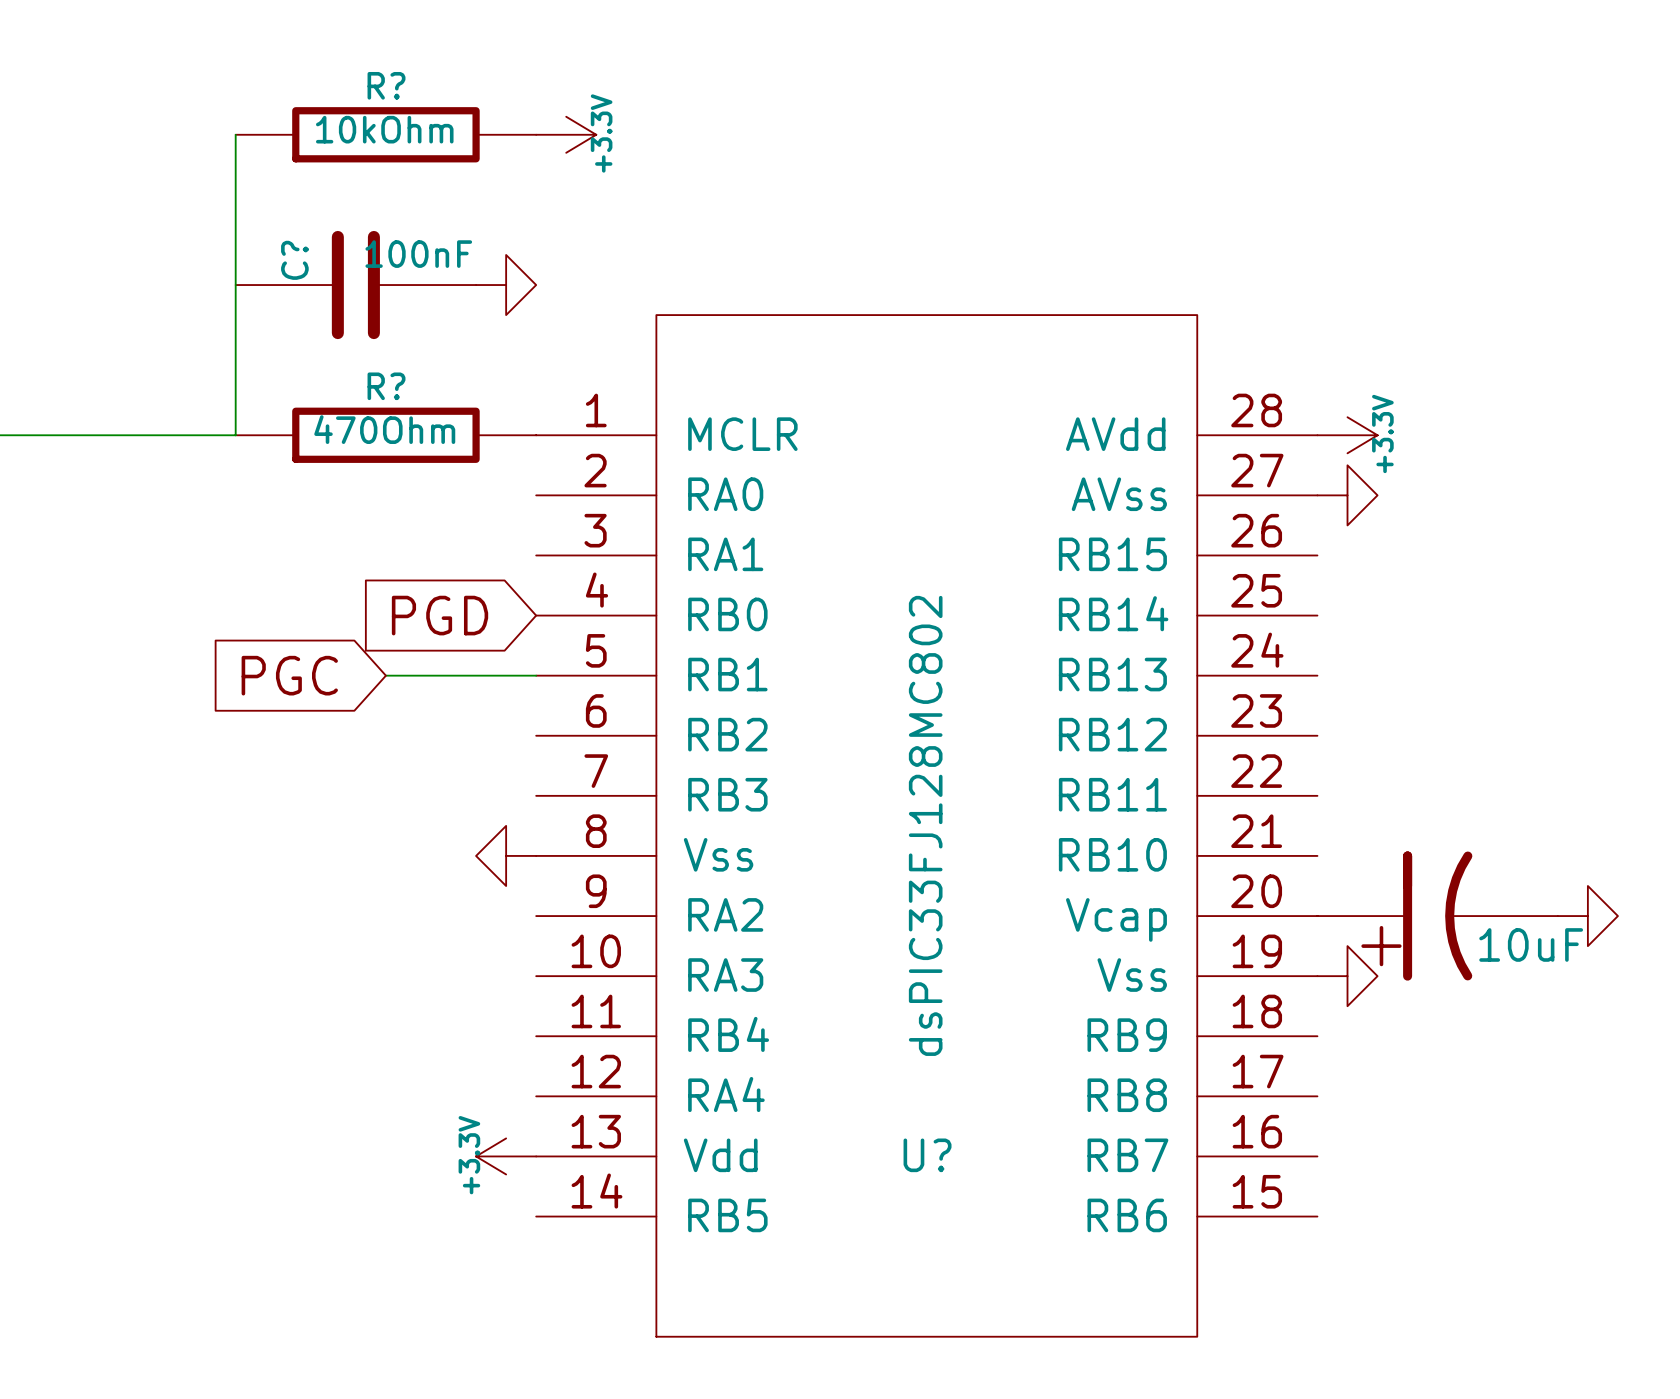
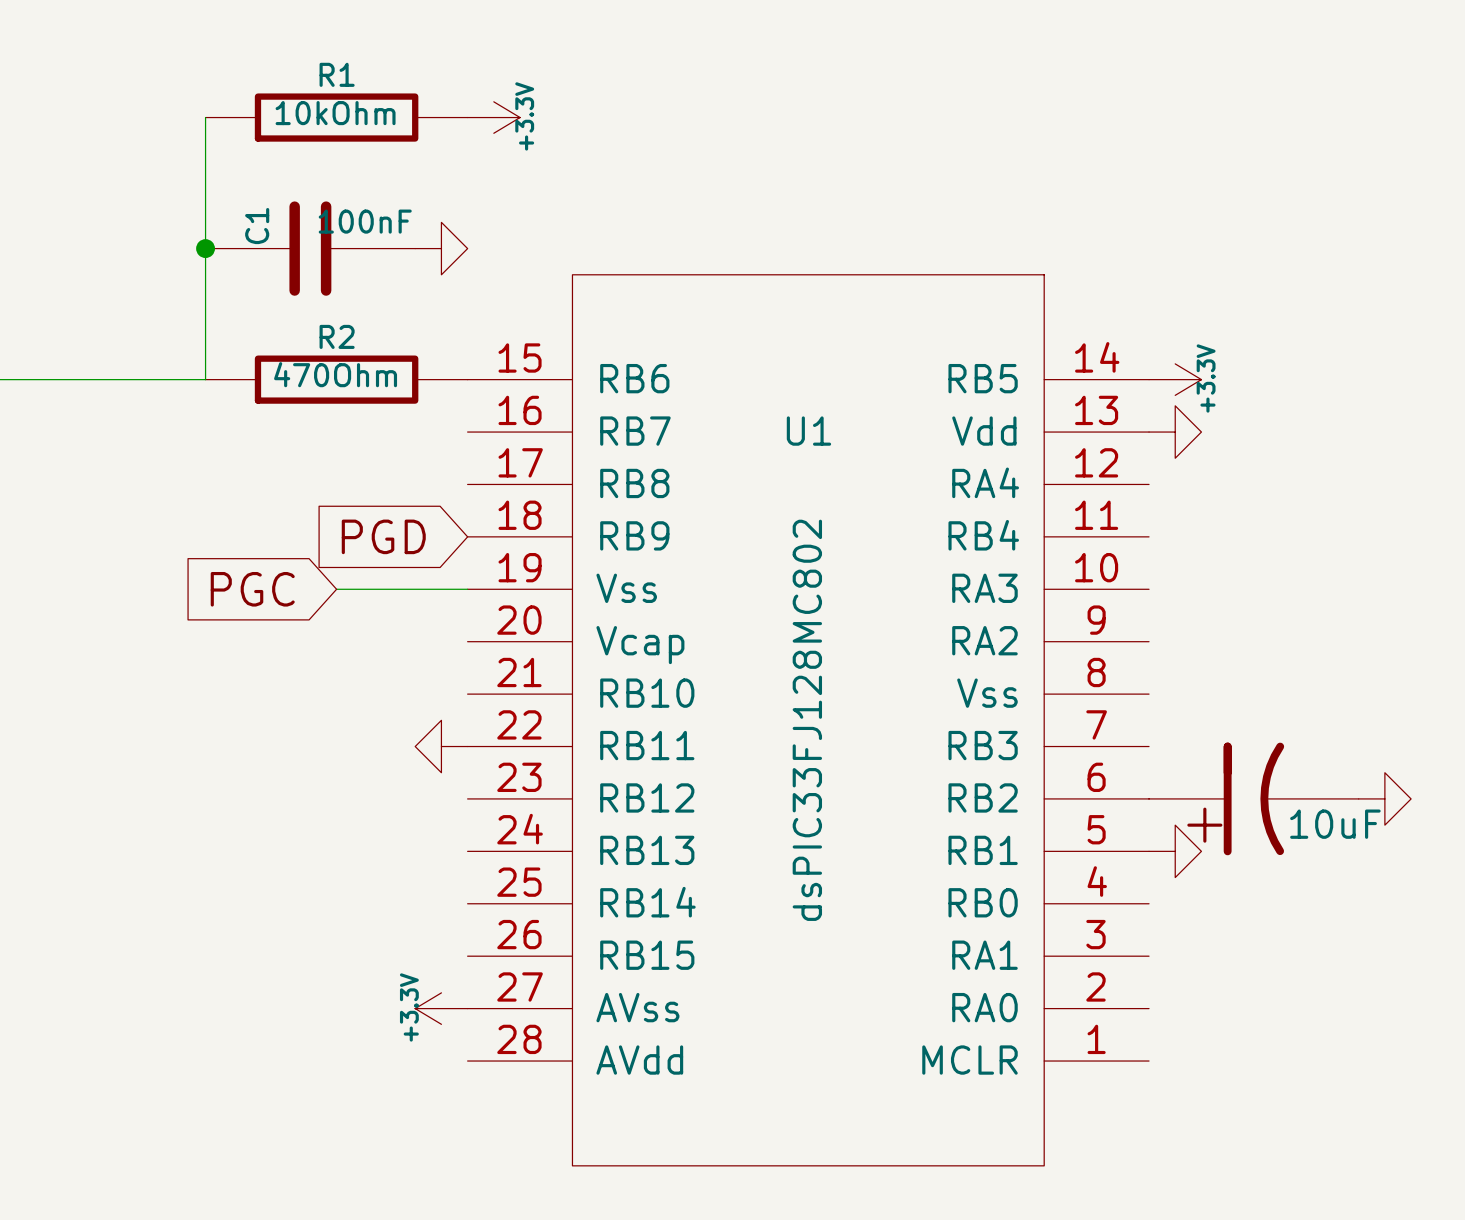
R? name: R? (386, 85) -> R1 (337, 74)
C? name: C? (294, 260) -> C1 (257, 226)
junction: none -> (205, 248)
R? name: R? (386, 386) -> R2 (337, 336)
U? rotation: 0° (926, 825) -> 180° (808, 720)
U? name: U? (927, 1155) -> U1 (808, 431)

